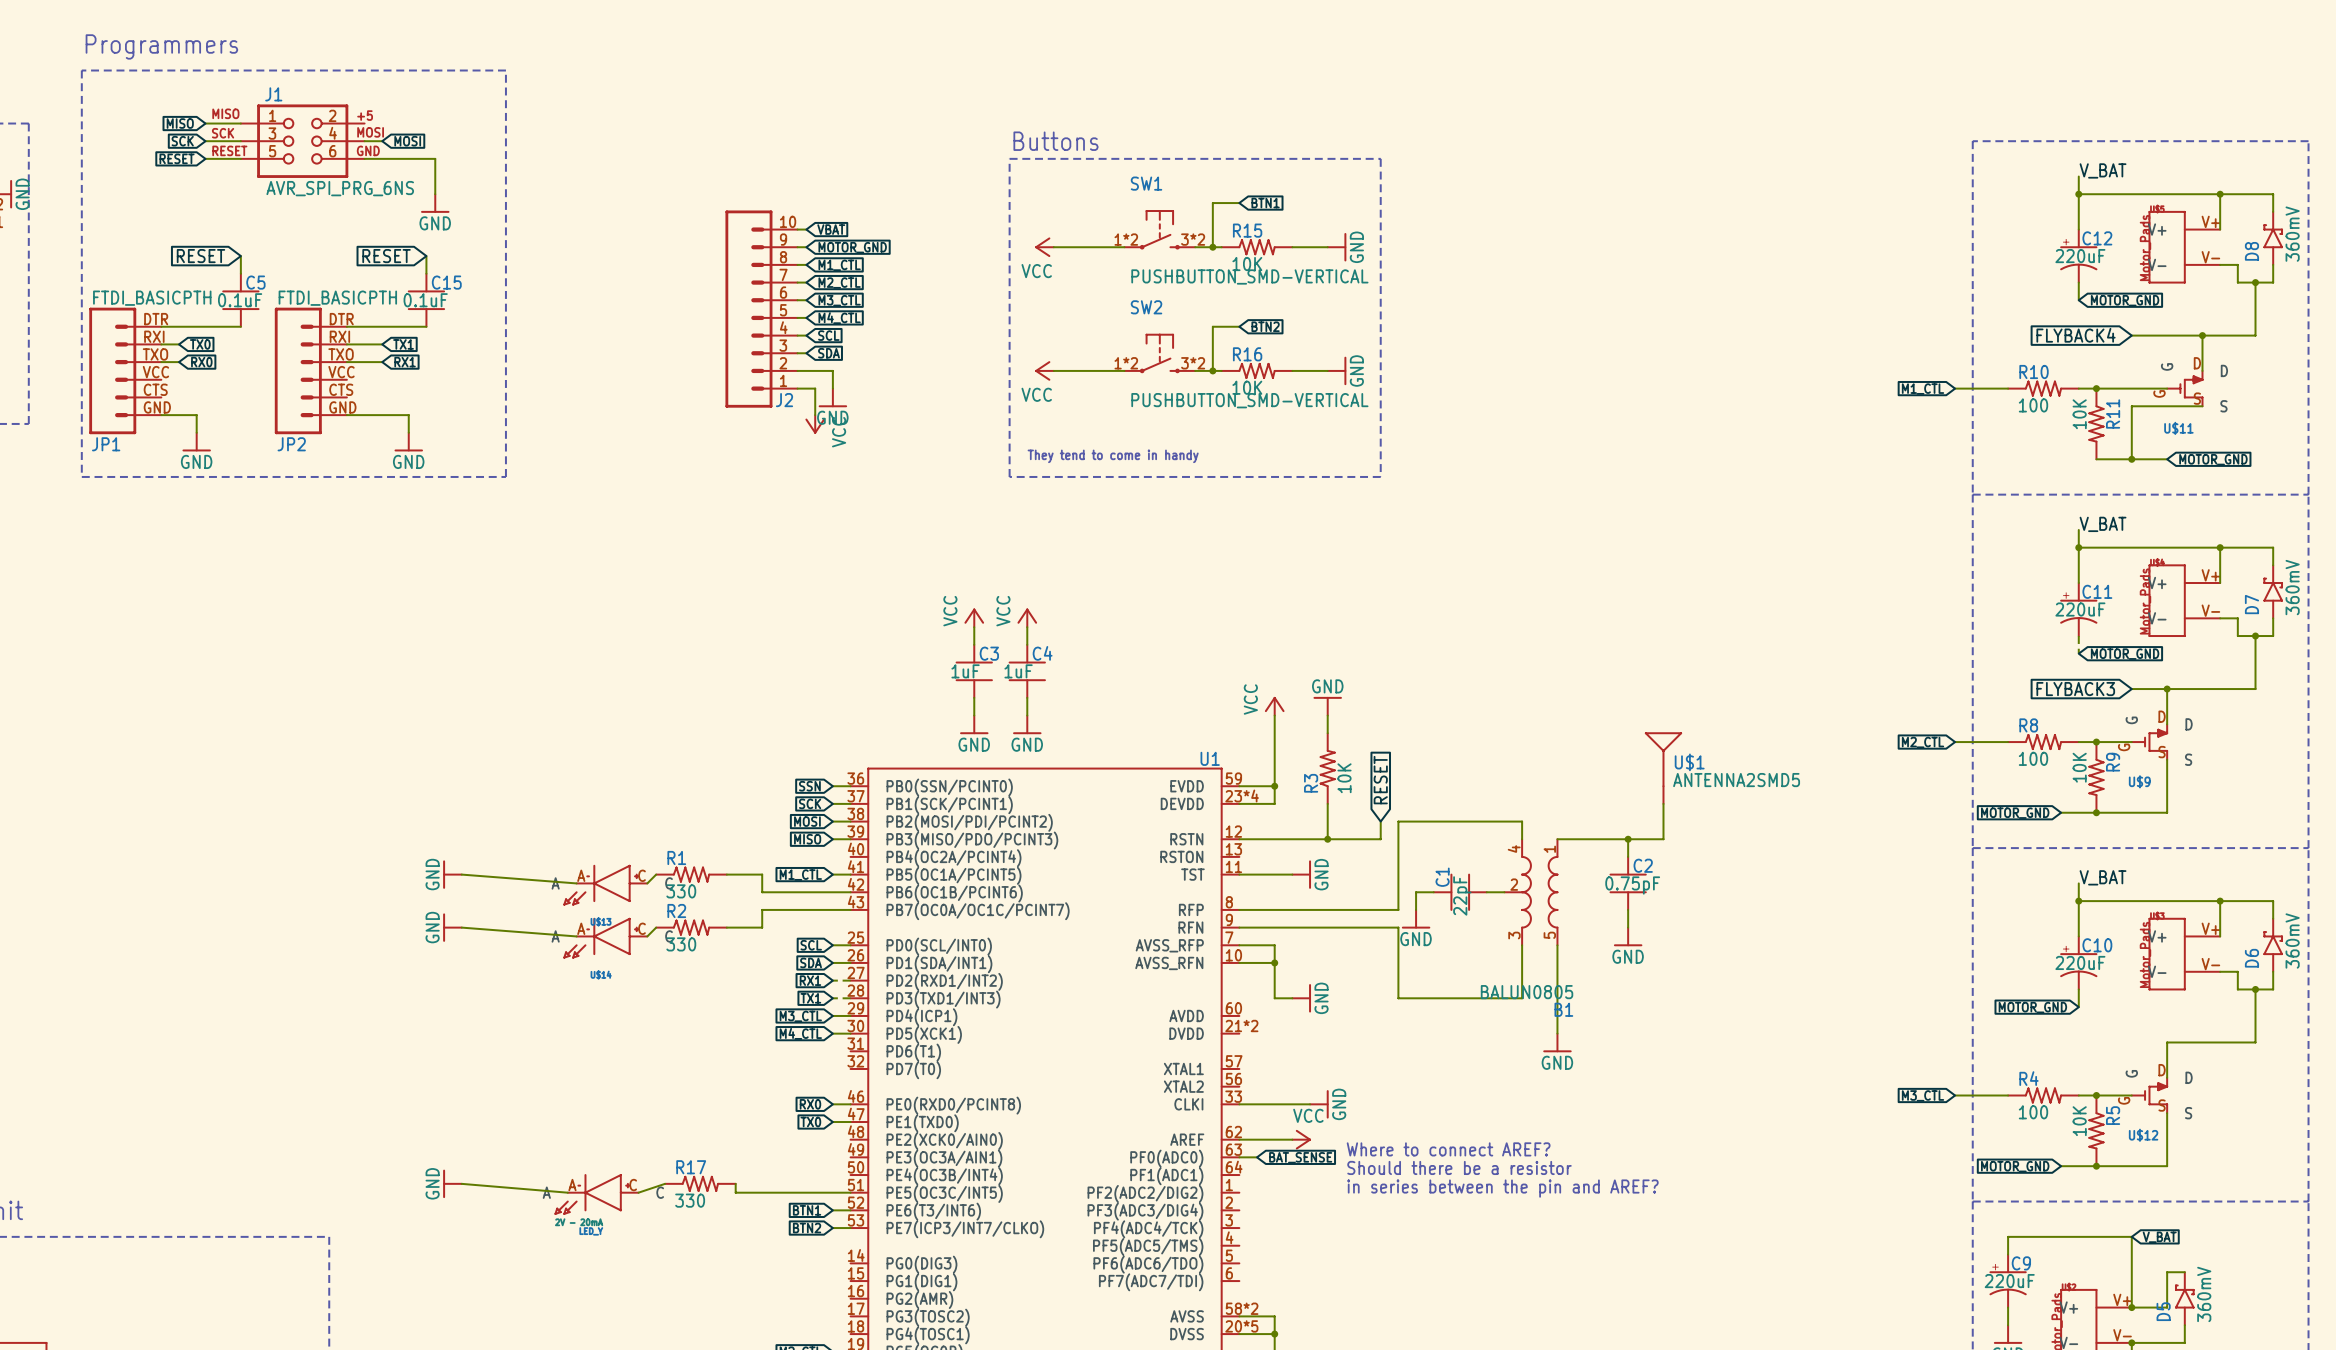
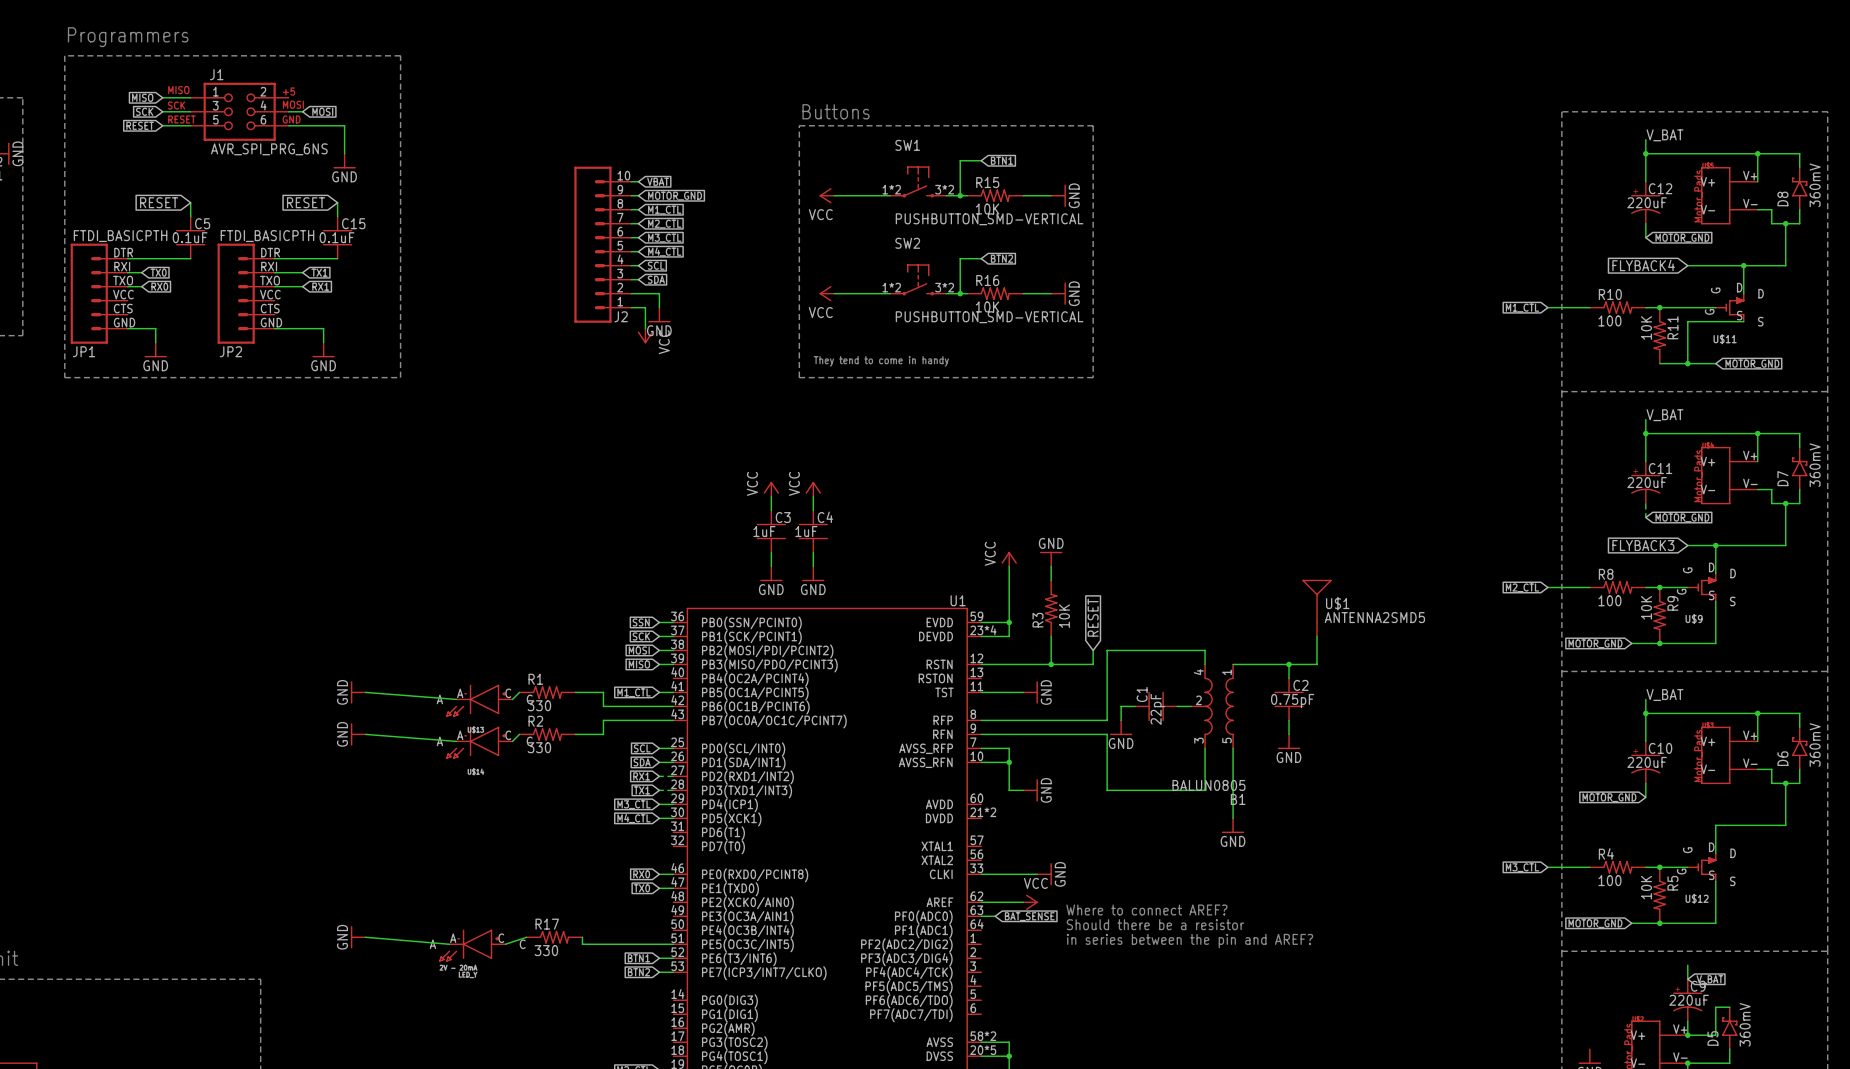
wire: (2008, 1254) (2008, 1236) (2131, 1236) (2131, 1289) -> none
C9 position: (2008, 1281) -> (1687, 1000)
wire: (2008, 1307) (2008, 1325) -> (1687, 965) (1687, 979)

